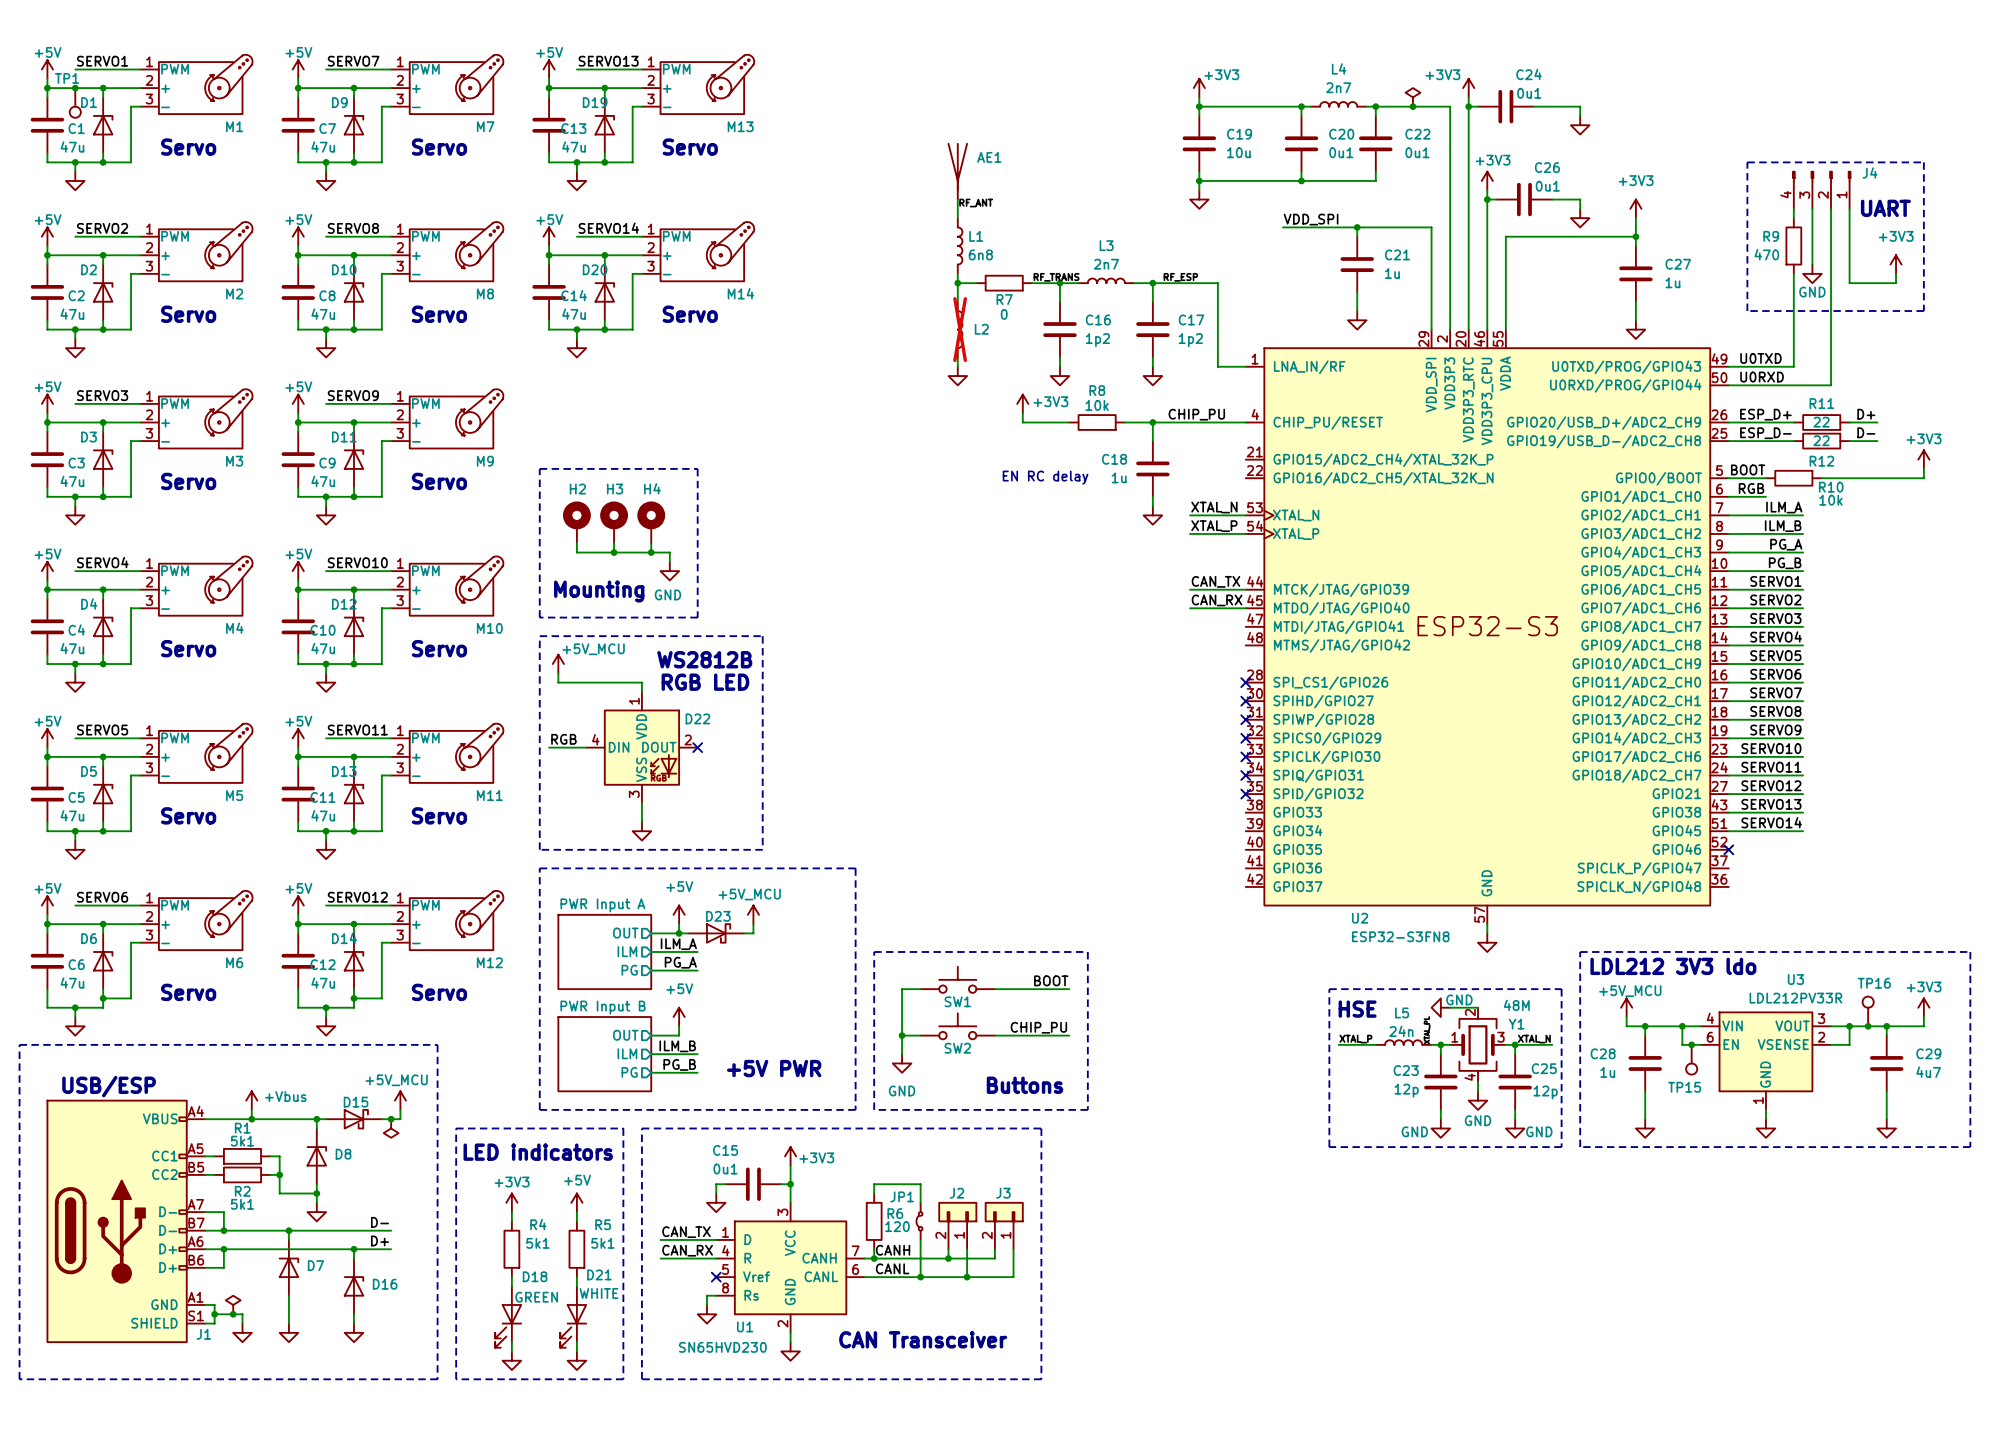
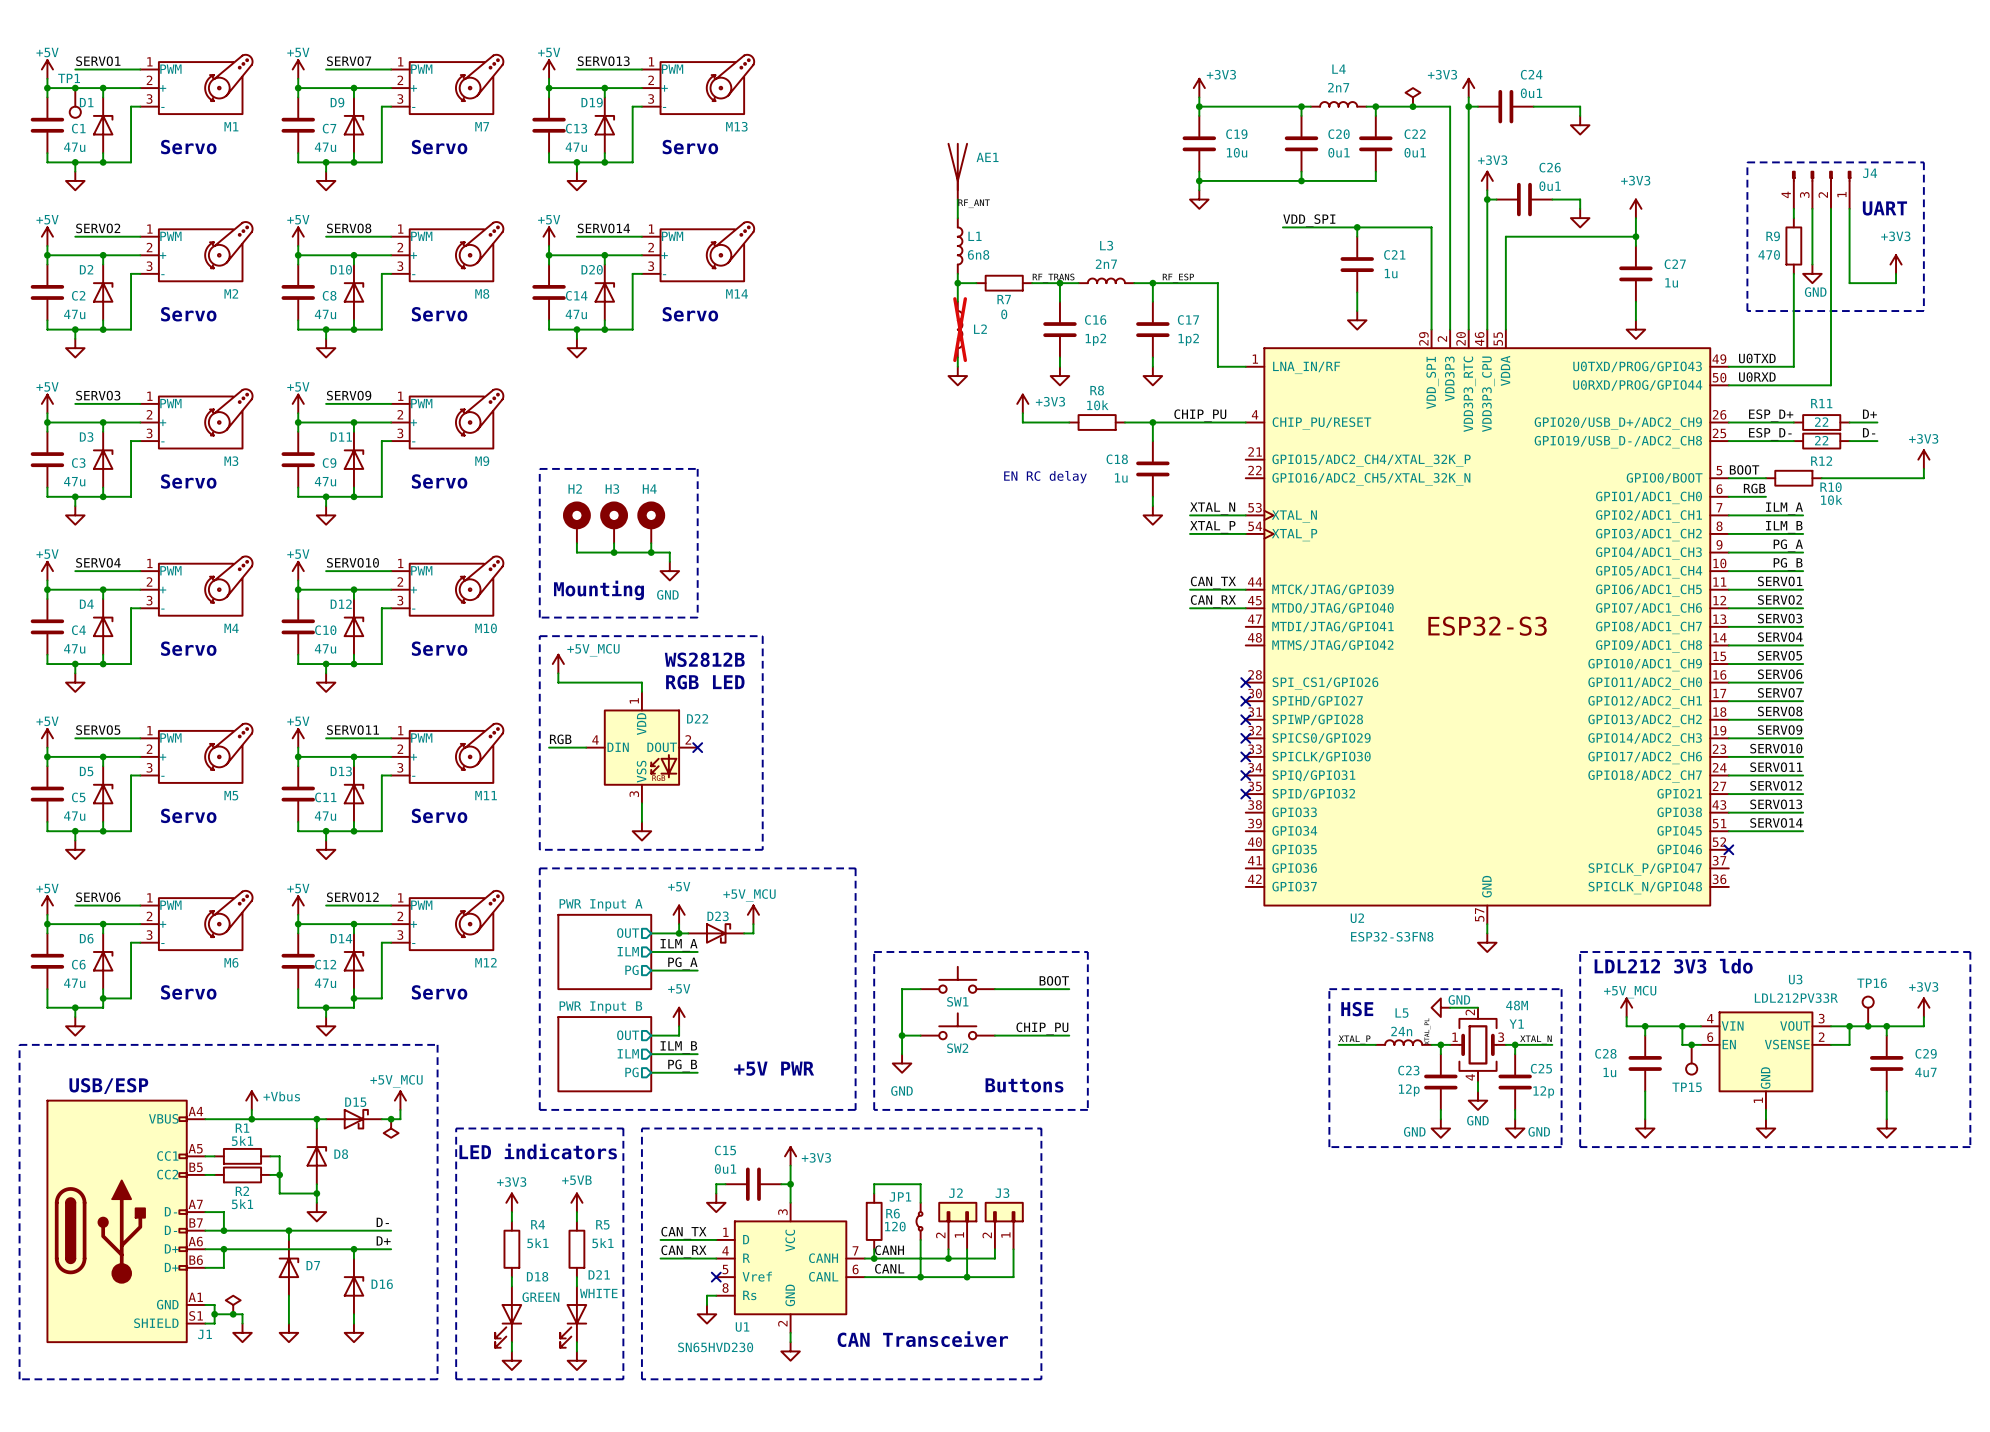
power symbol: +5V (576, 1202) -> +5VB (576, 1202)

